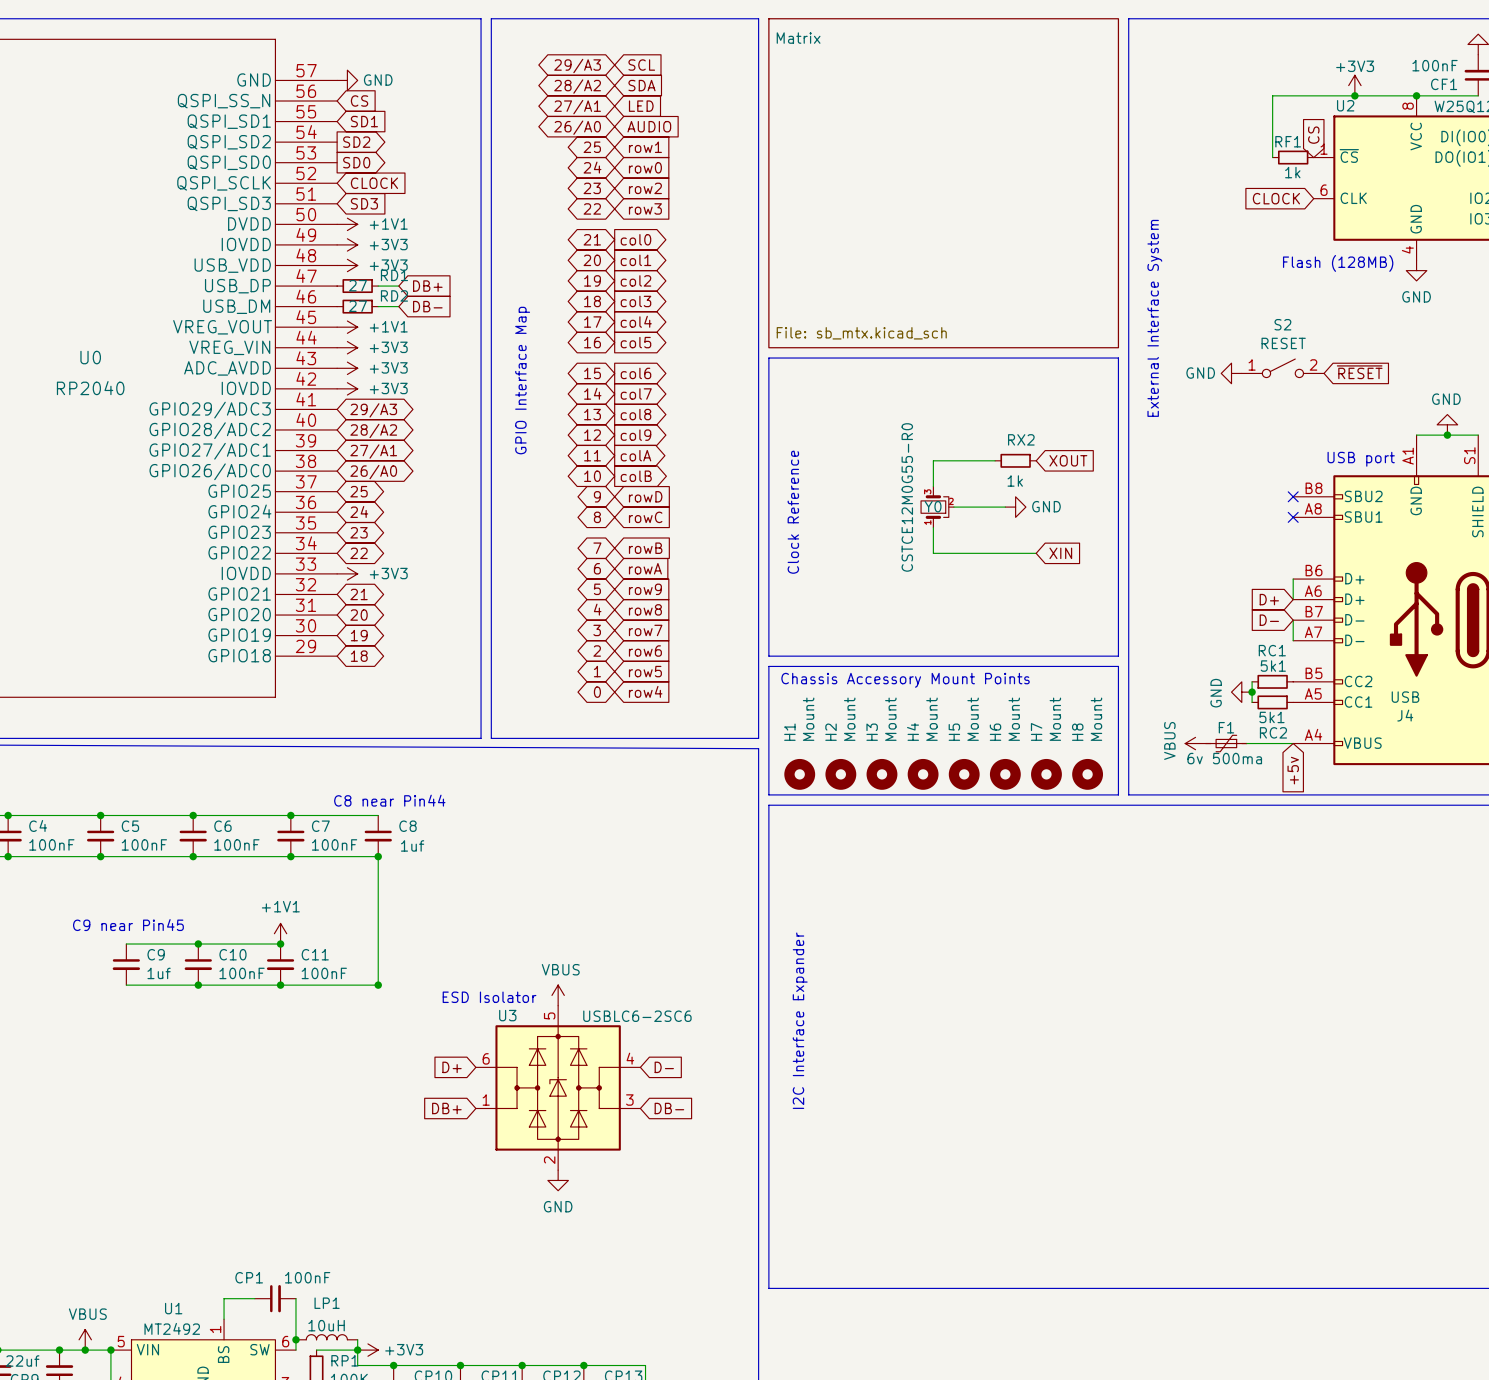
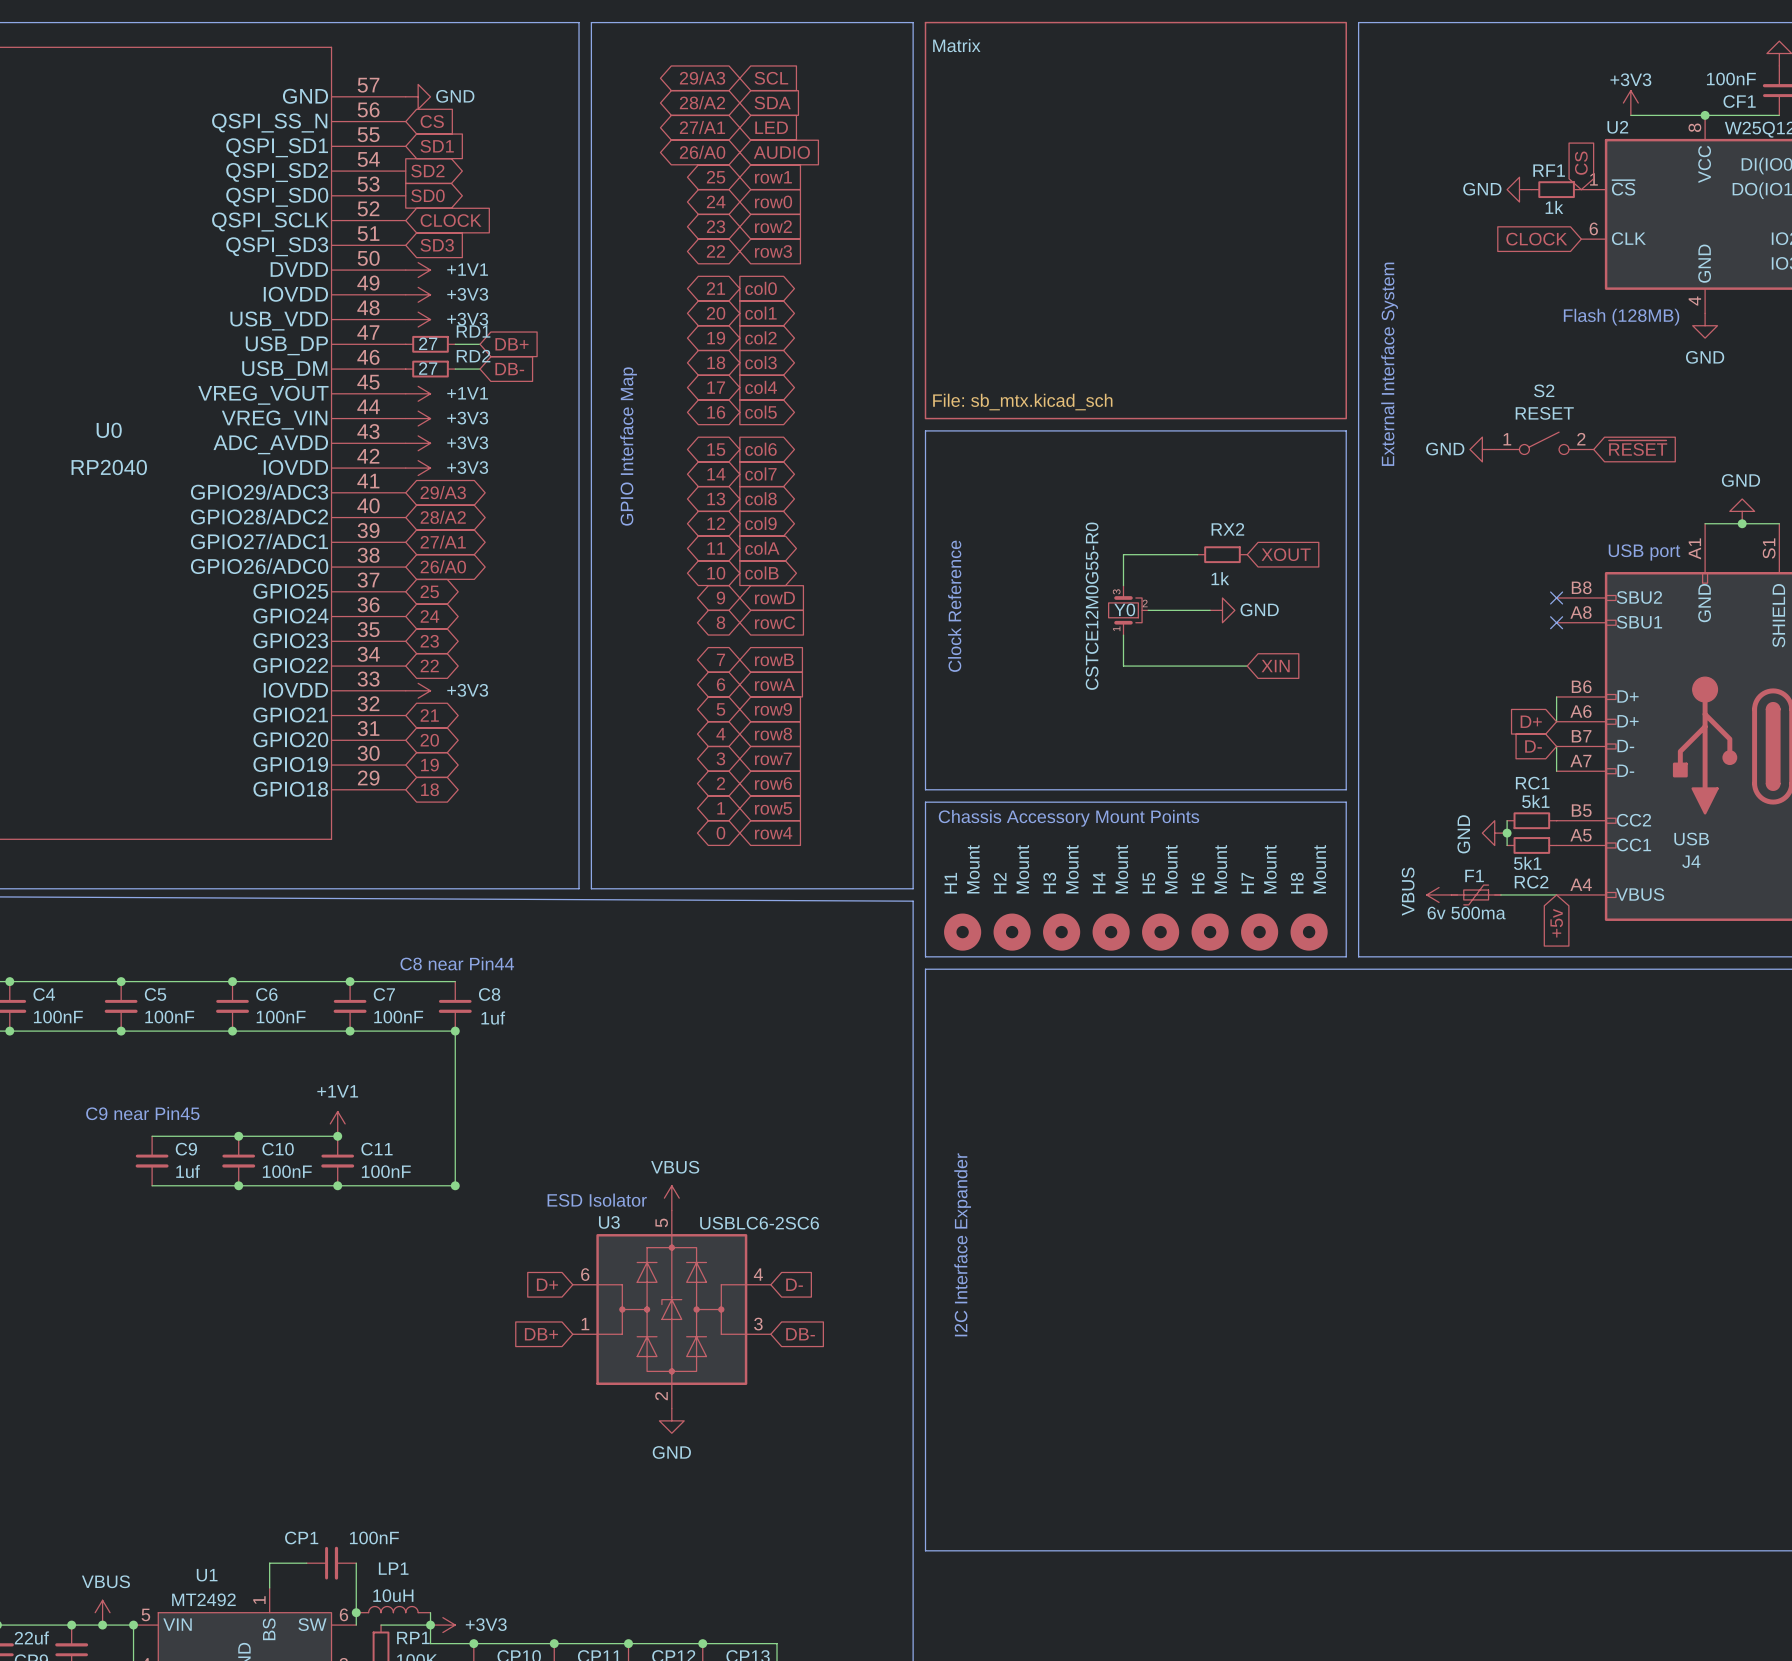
wire: (1354, 95) (1272, 95) (1272, 157) -> none
junction: (1354, 95) -> none
power symbol: none -> GND (1519, 189)

